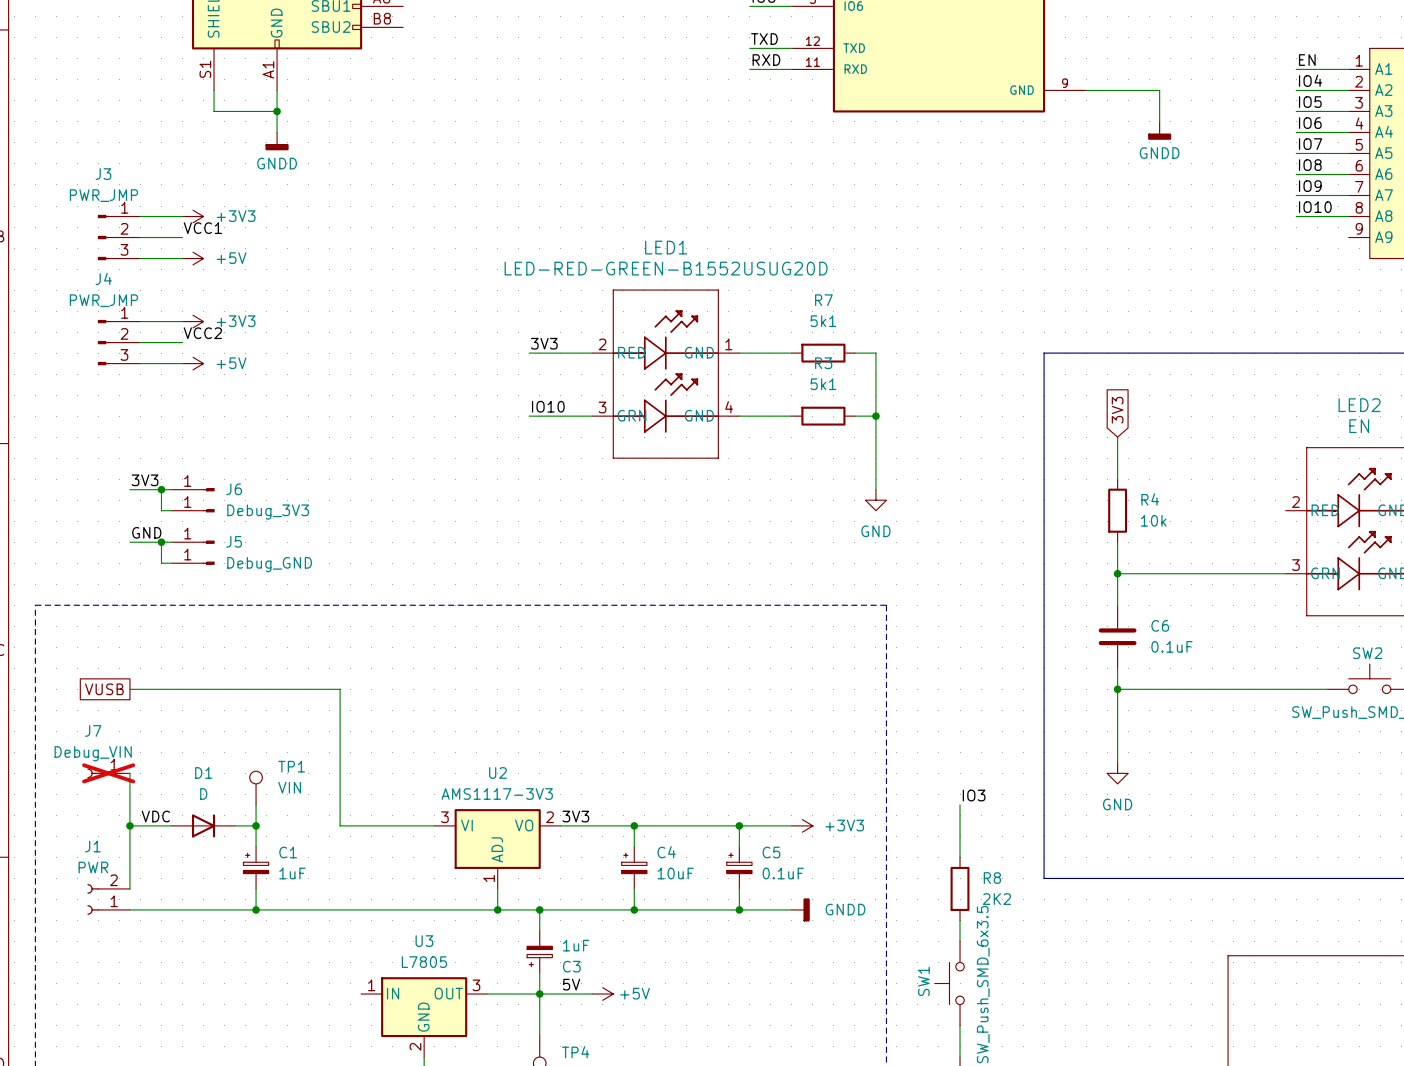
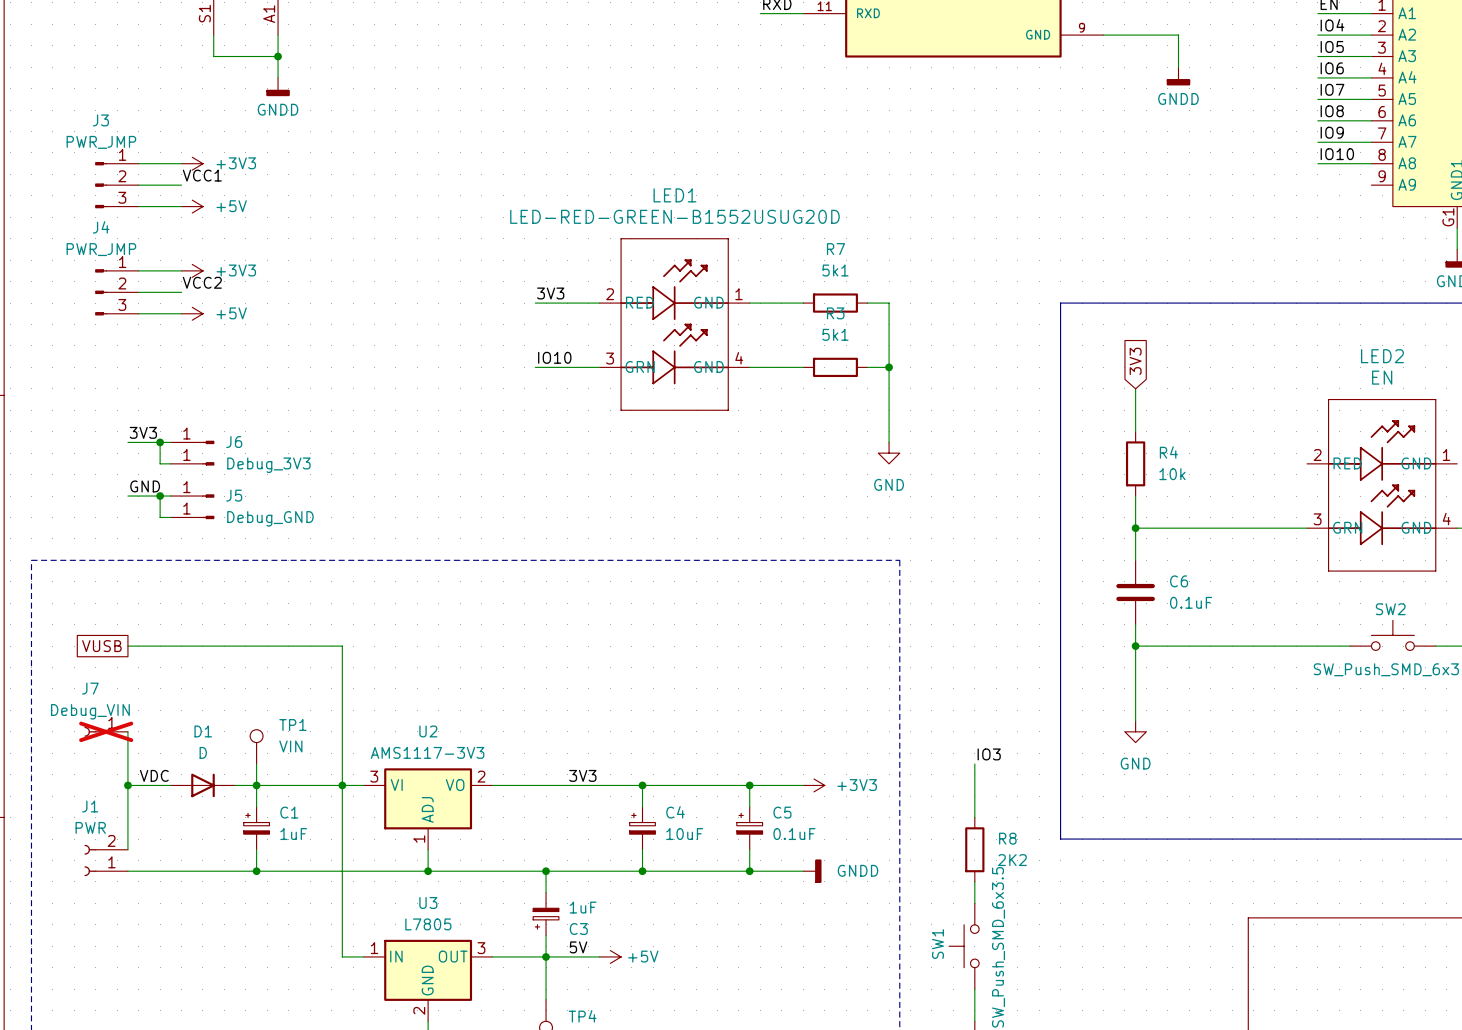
wire: none -> (256, 785) (342, 785) (342, 956) (363, 956)
junction: none -> (342, 785)
U2 position: (497, 849) -> (428, 809)
wire: (497, 888) (497, 909) -> (428, 849) (428, 871)
junction: none -> (428, 871)
junction: (497, 909) -> none

